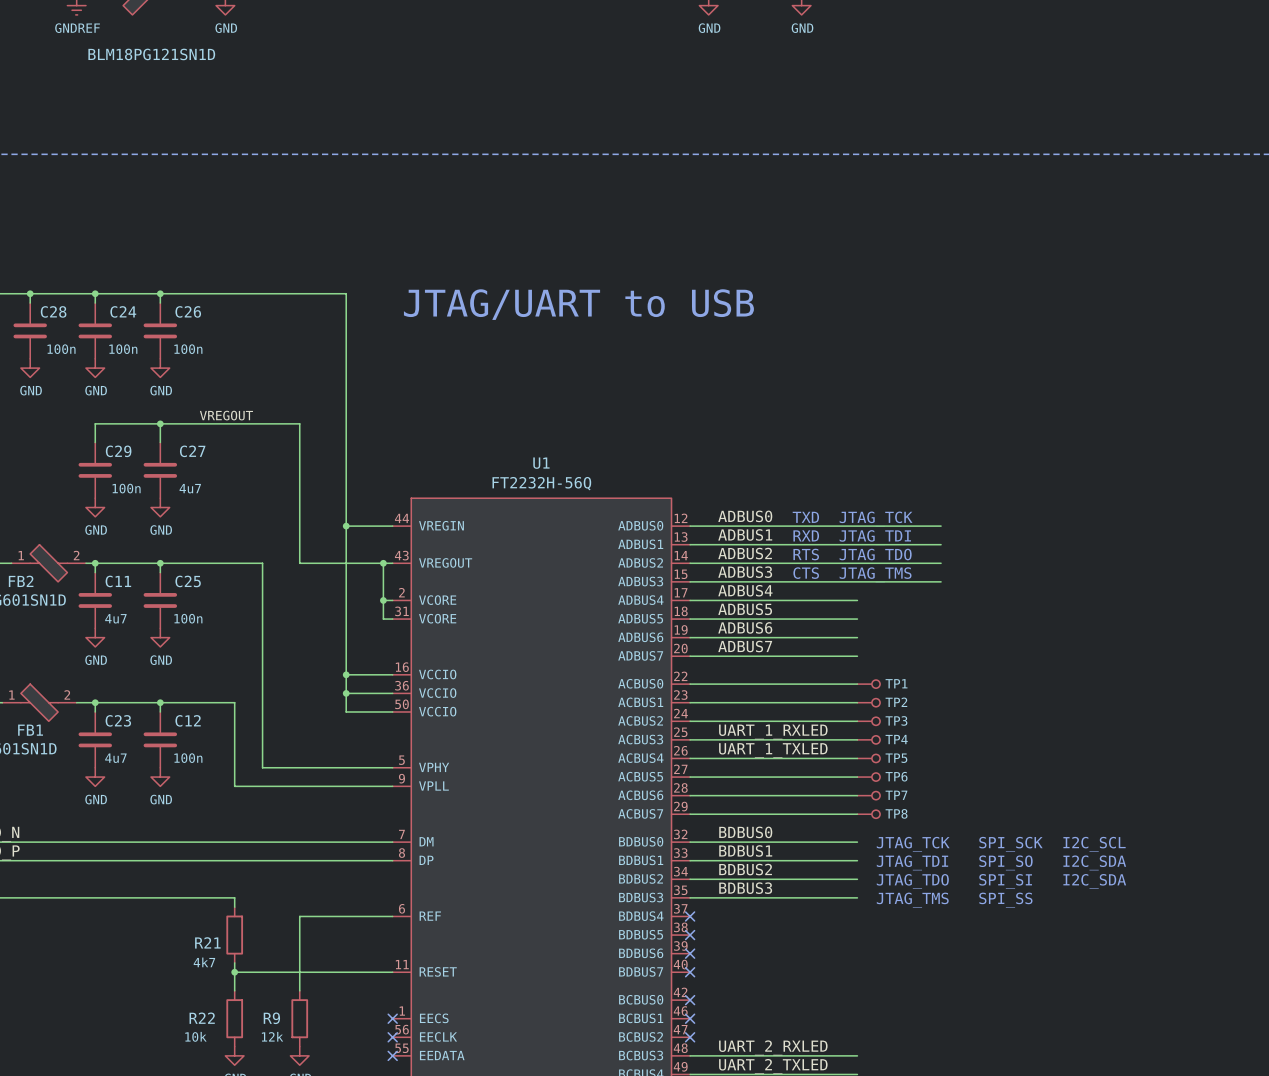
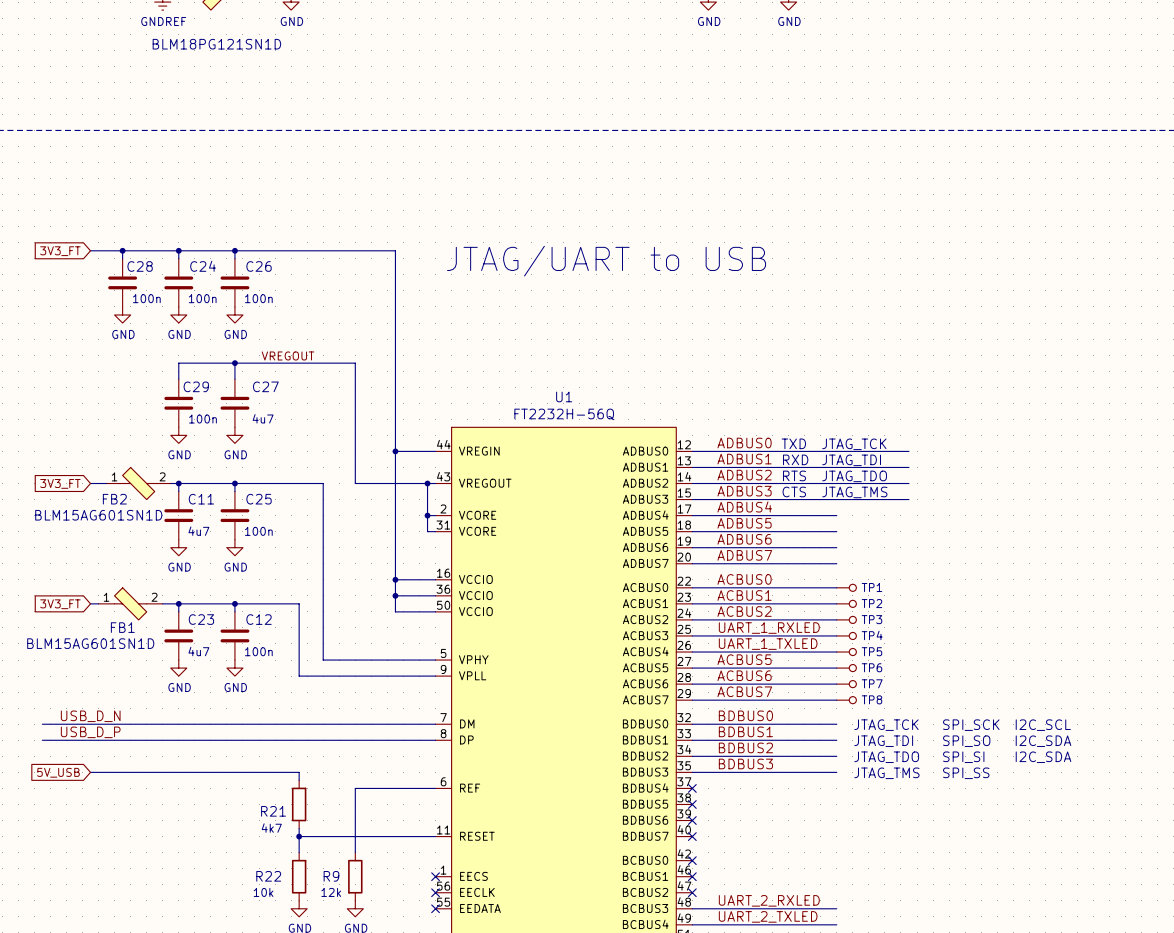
label: none -> ACBUS0 (744, 579)
label: none -> ACBUS1 (744, 595)
label: none -> ACBUS2 (744, 611)
label: none -> ACBUS5 (744, 659)
label: none -> ACBUS6 (744, 675)
label: none -> ACBUS7 (744, 691)

